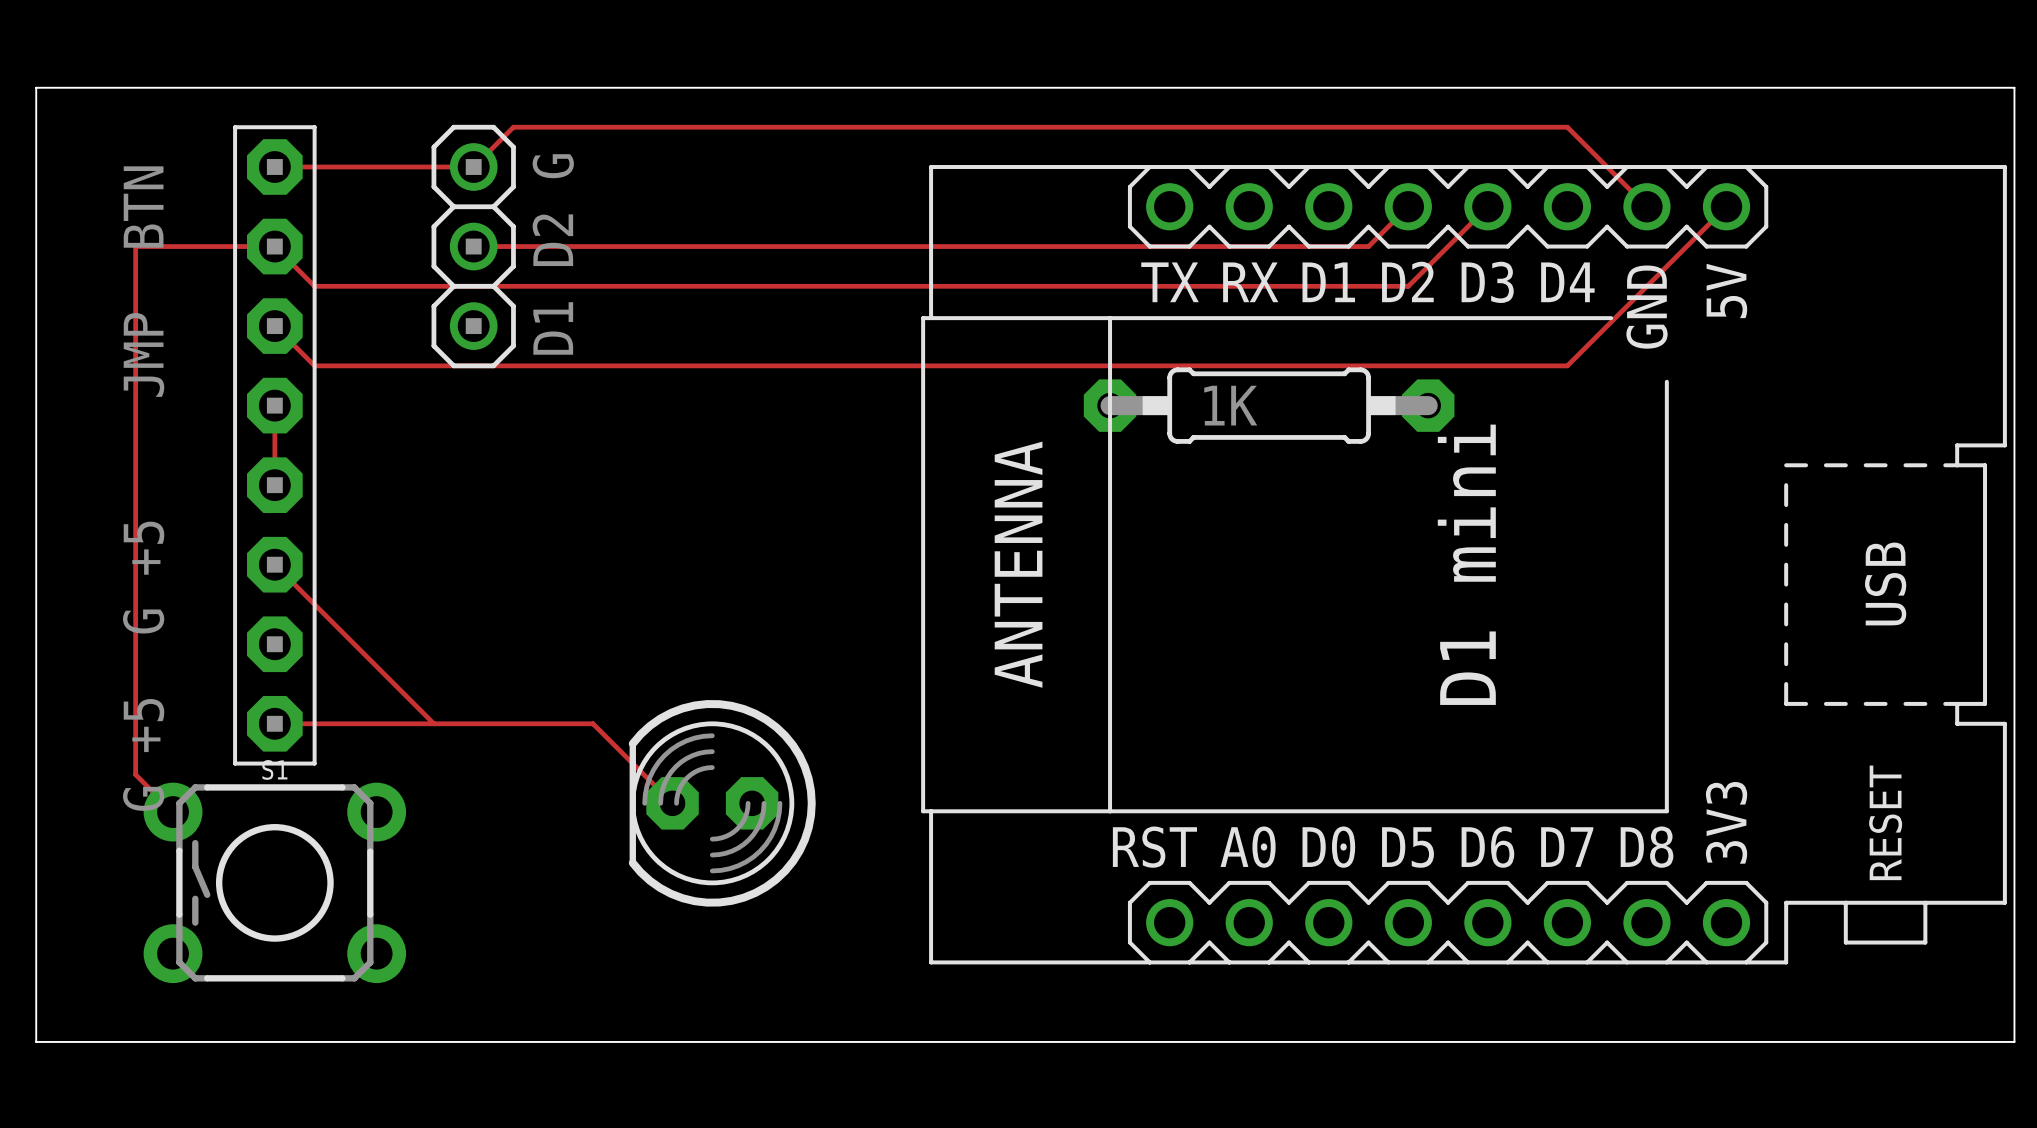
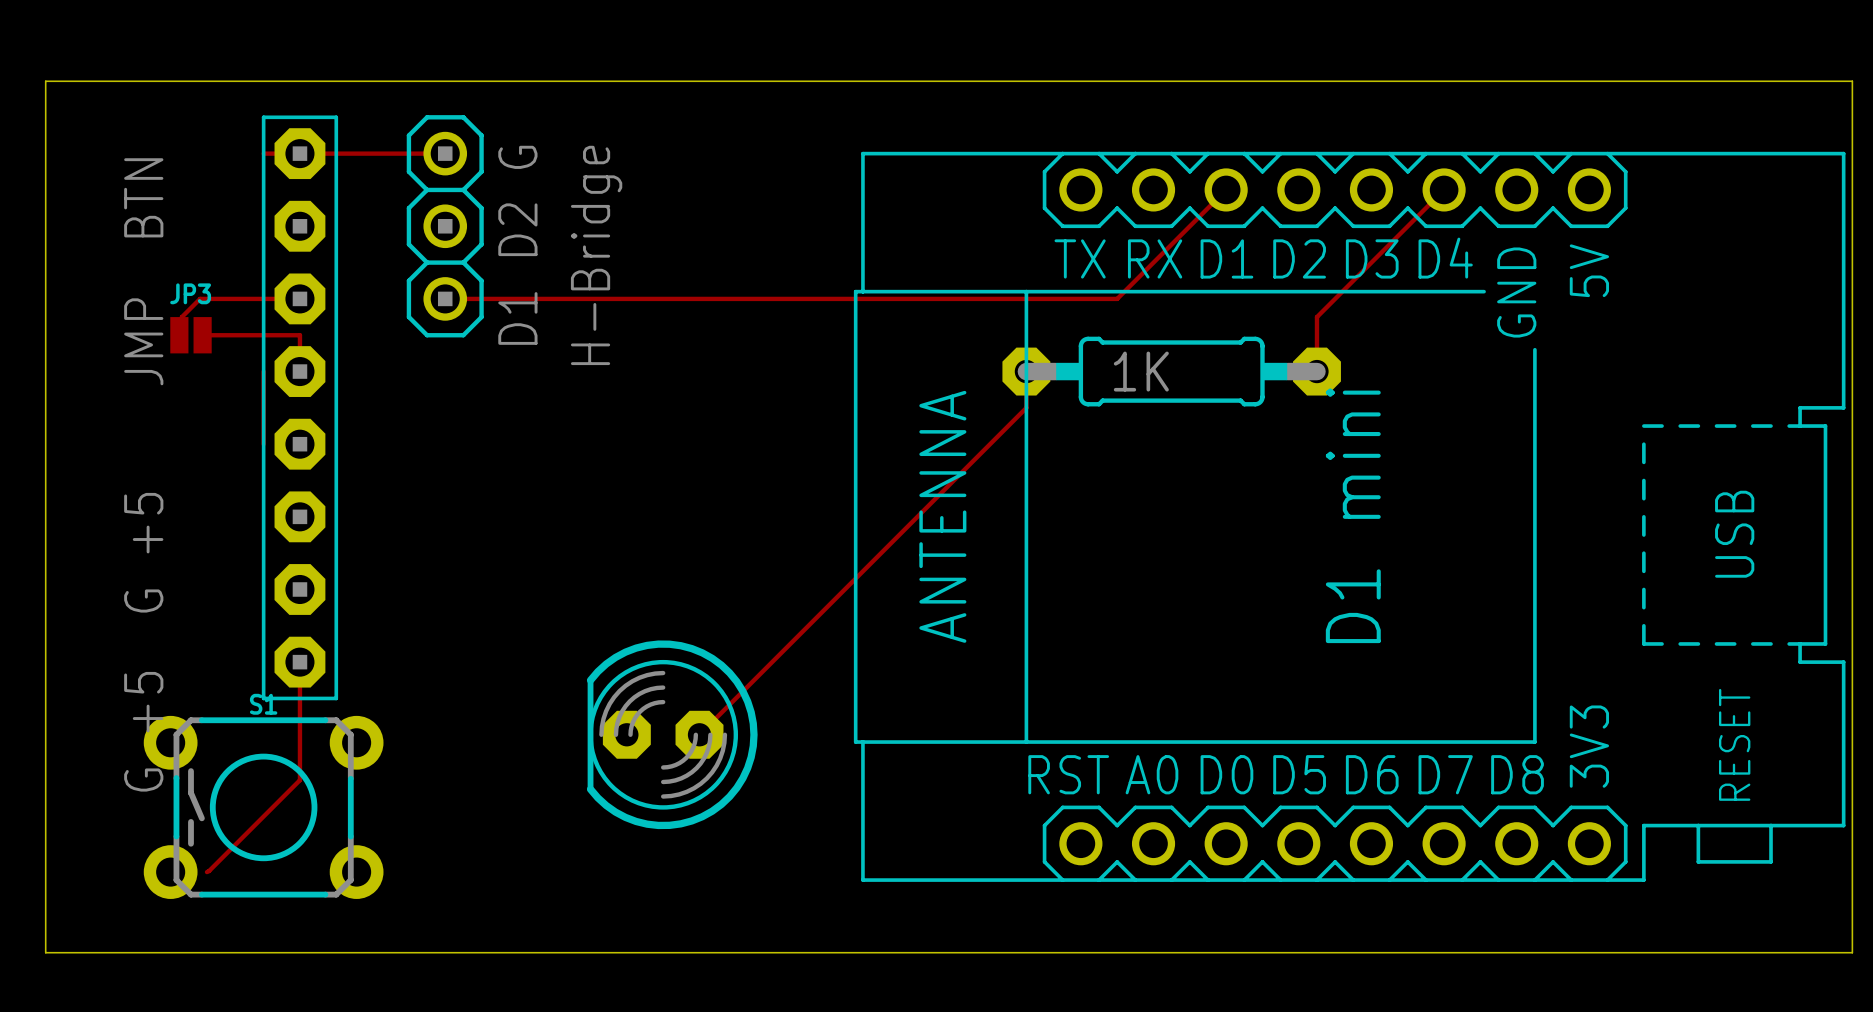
track: (473, 166) (513, 127) (1567, 127) (1646, 206) -> none
track: none -> (1226, 189) (1117, 298) (445, 298)
track: (1408, 206) (1368, 246) (473, 246) -> none
track: (1487, 206) (1408, 286) (314, 286) (274, 246) (135, 246) (135, 774) (173, 812) -> none
track: none -> (1444, 189) (1316, 317) (1316, 371)
track: (1726, 206) (1567, 365) (314, 365) (274, 326) -> none
text: none -> H-Bridge (596, 255)
track: none -> (299, 298) (200, 298) (181, 317) (181, 335) (179, 335)
JP3: none -> (190, 335)
track: none -> (202, 335) (299, 335) (299, 371)
track: none -> (1026, 371) (1026, 407) (699, 734)
part position: (274, 445) -> (299, 407)
track: (274, 564) (433, 723) -> none
track: (274, 723) (593, 723) (672, 803) -> none
track: none -> (299, 662) (299, 780) (206, 872)

